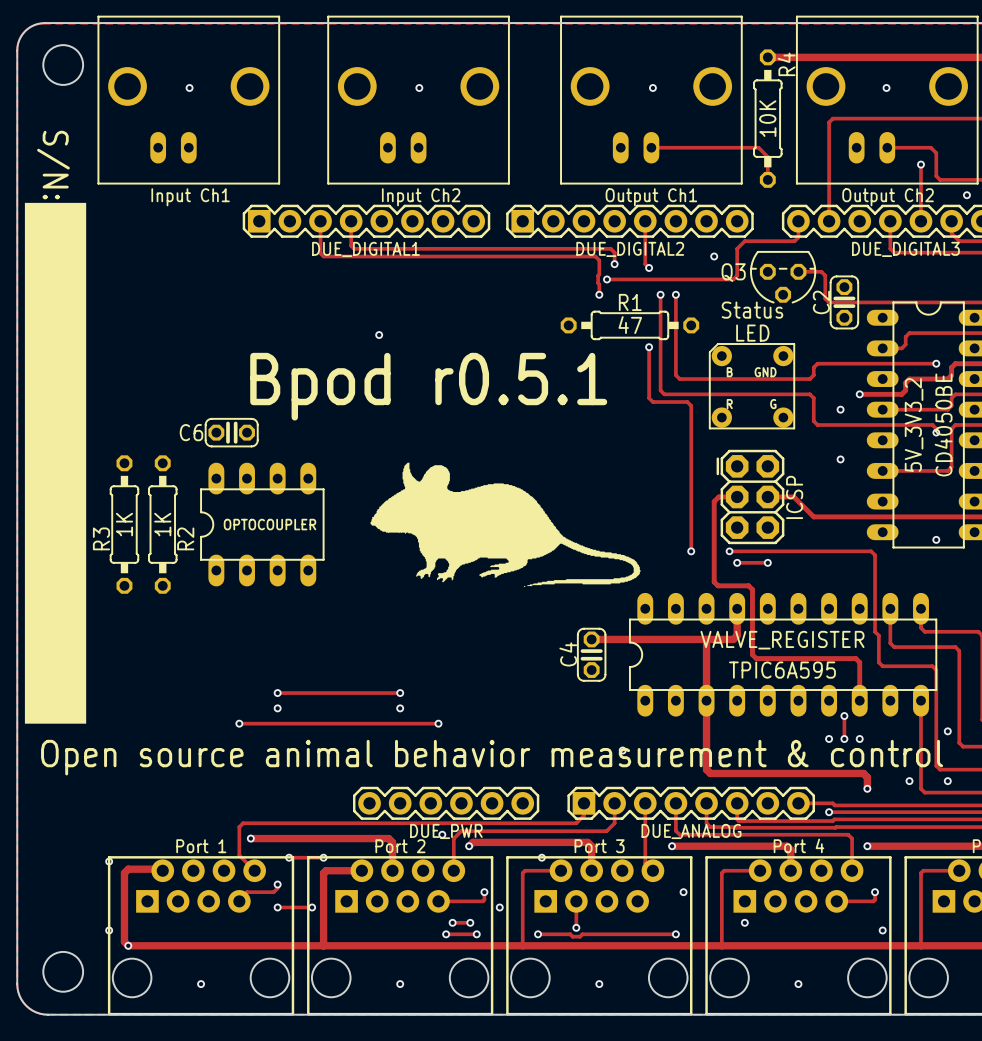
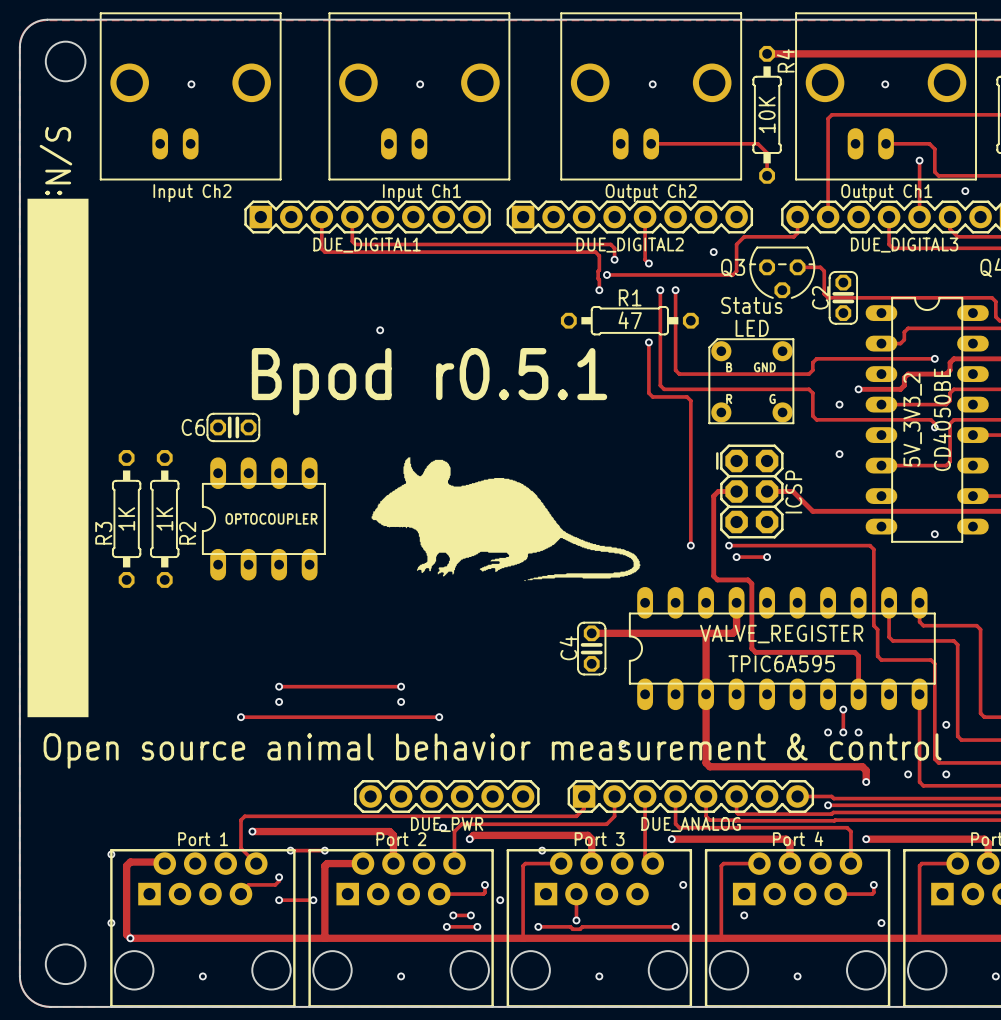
text: Input Ch1 (190, 197) -> Input Ch2 (192, 193)
text: Input Ch2 (421, 197) -> Input Ch1 (421, 193)
text: Output Ch1 (651, 197) -> Output Ch2 (651, 193)
text: Output Ch2 (888, 197) -> Output Ch1 (886, 193)

